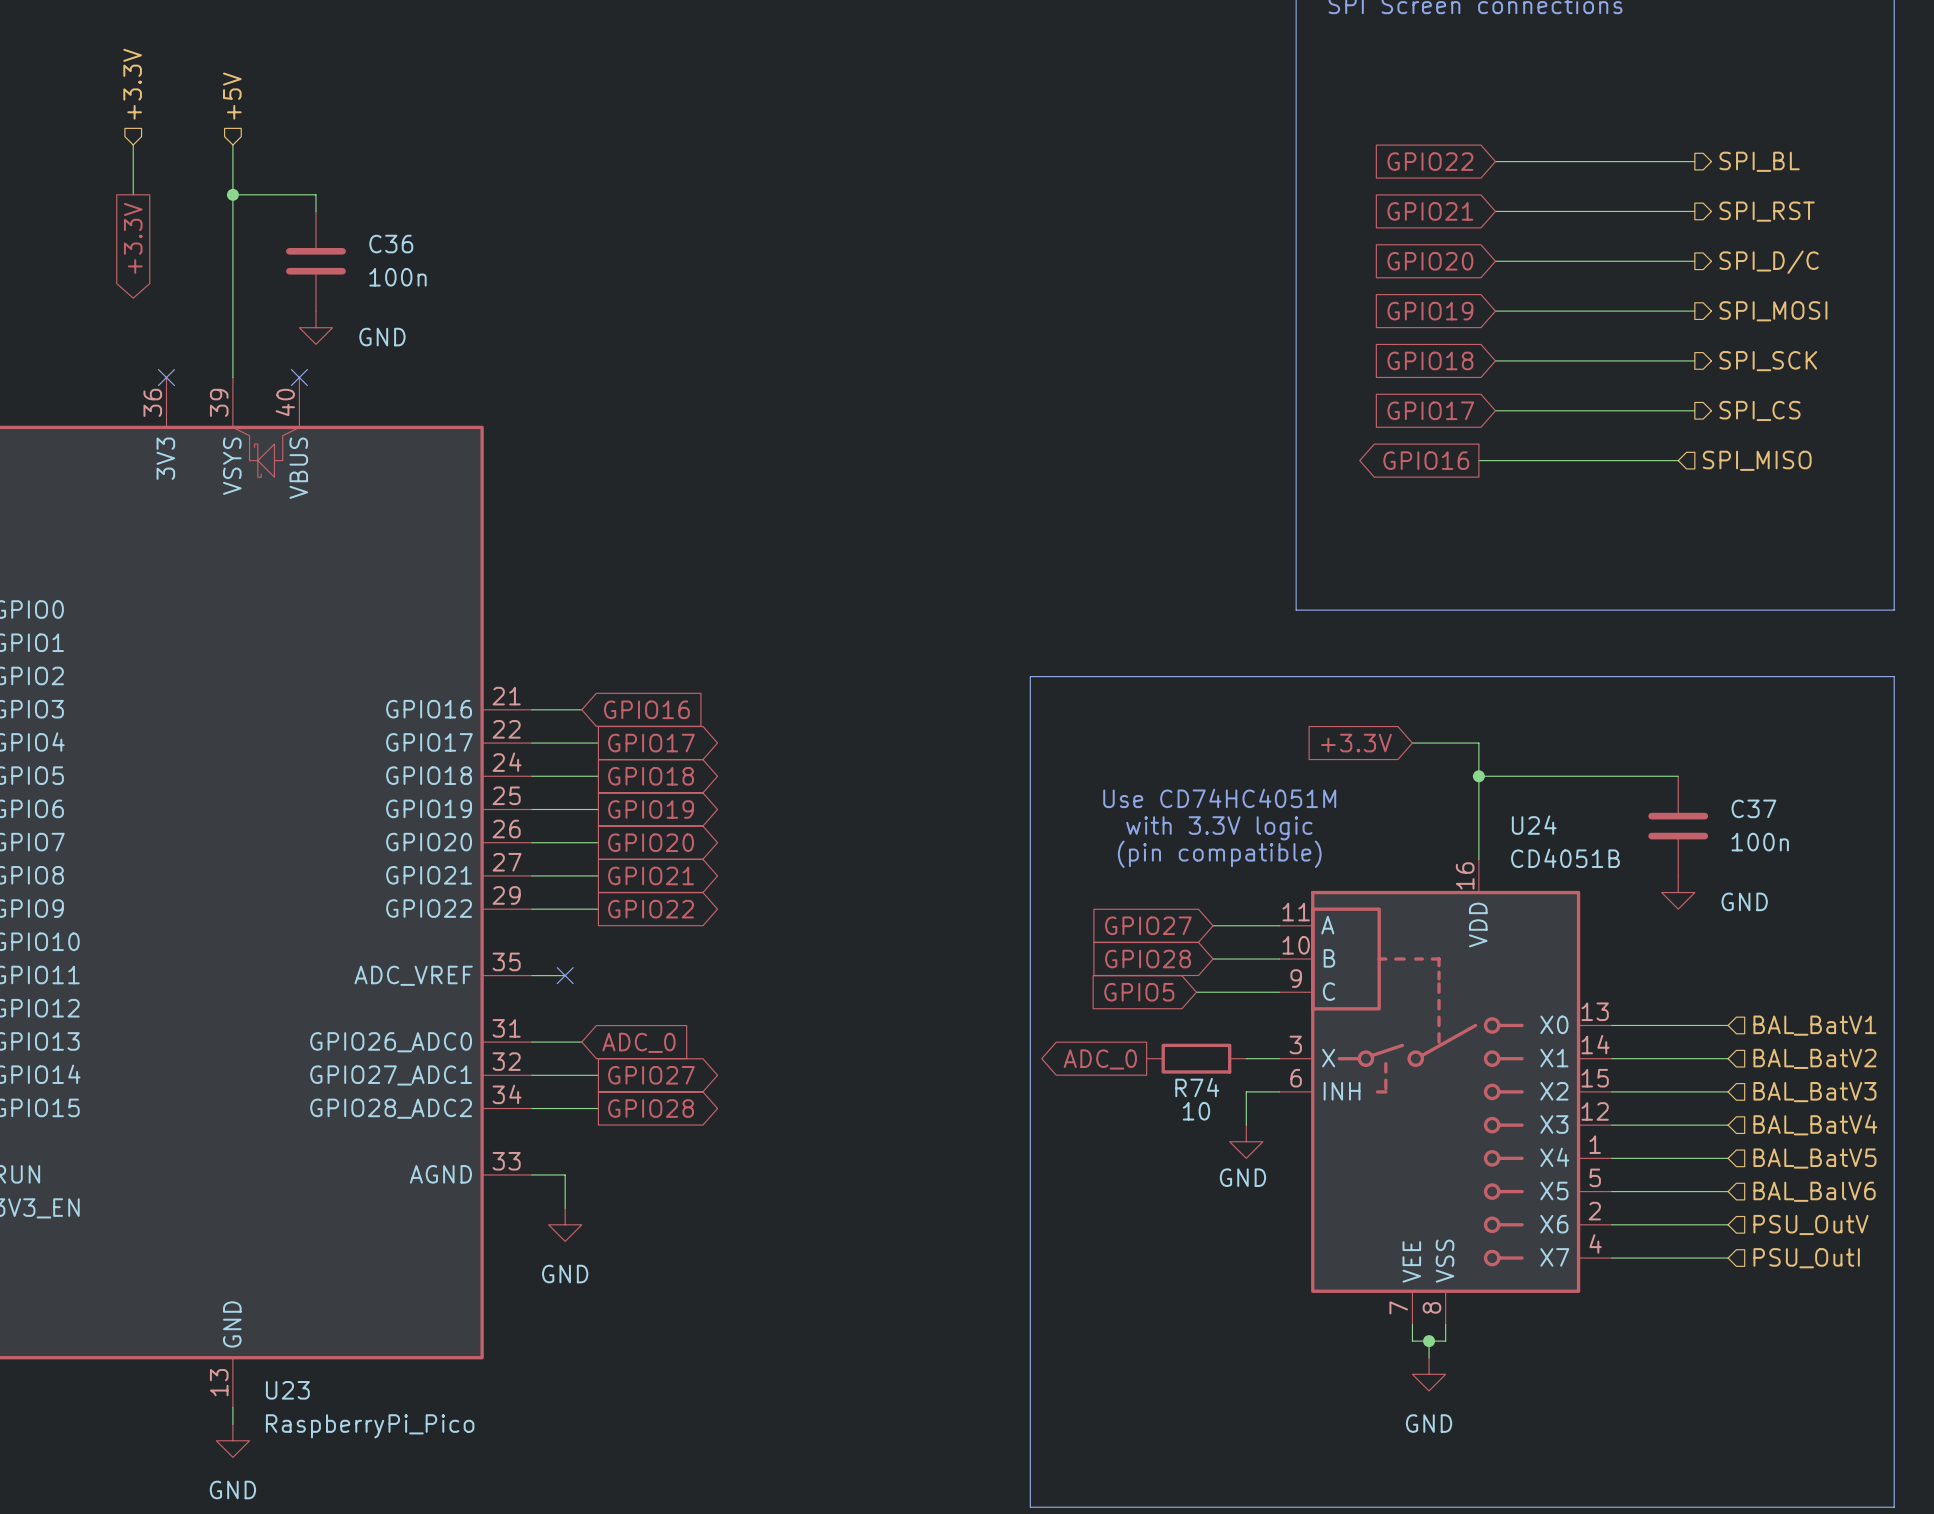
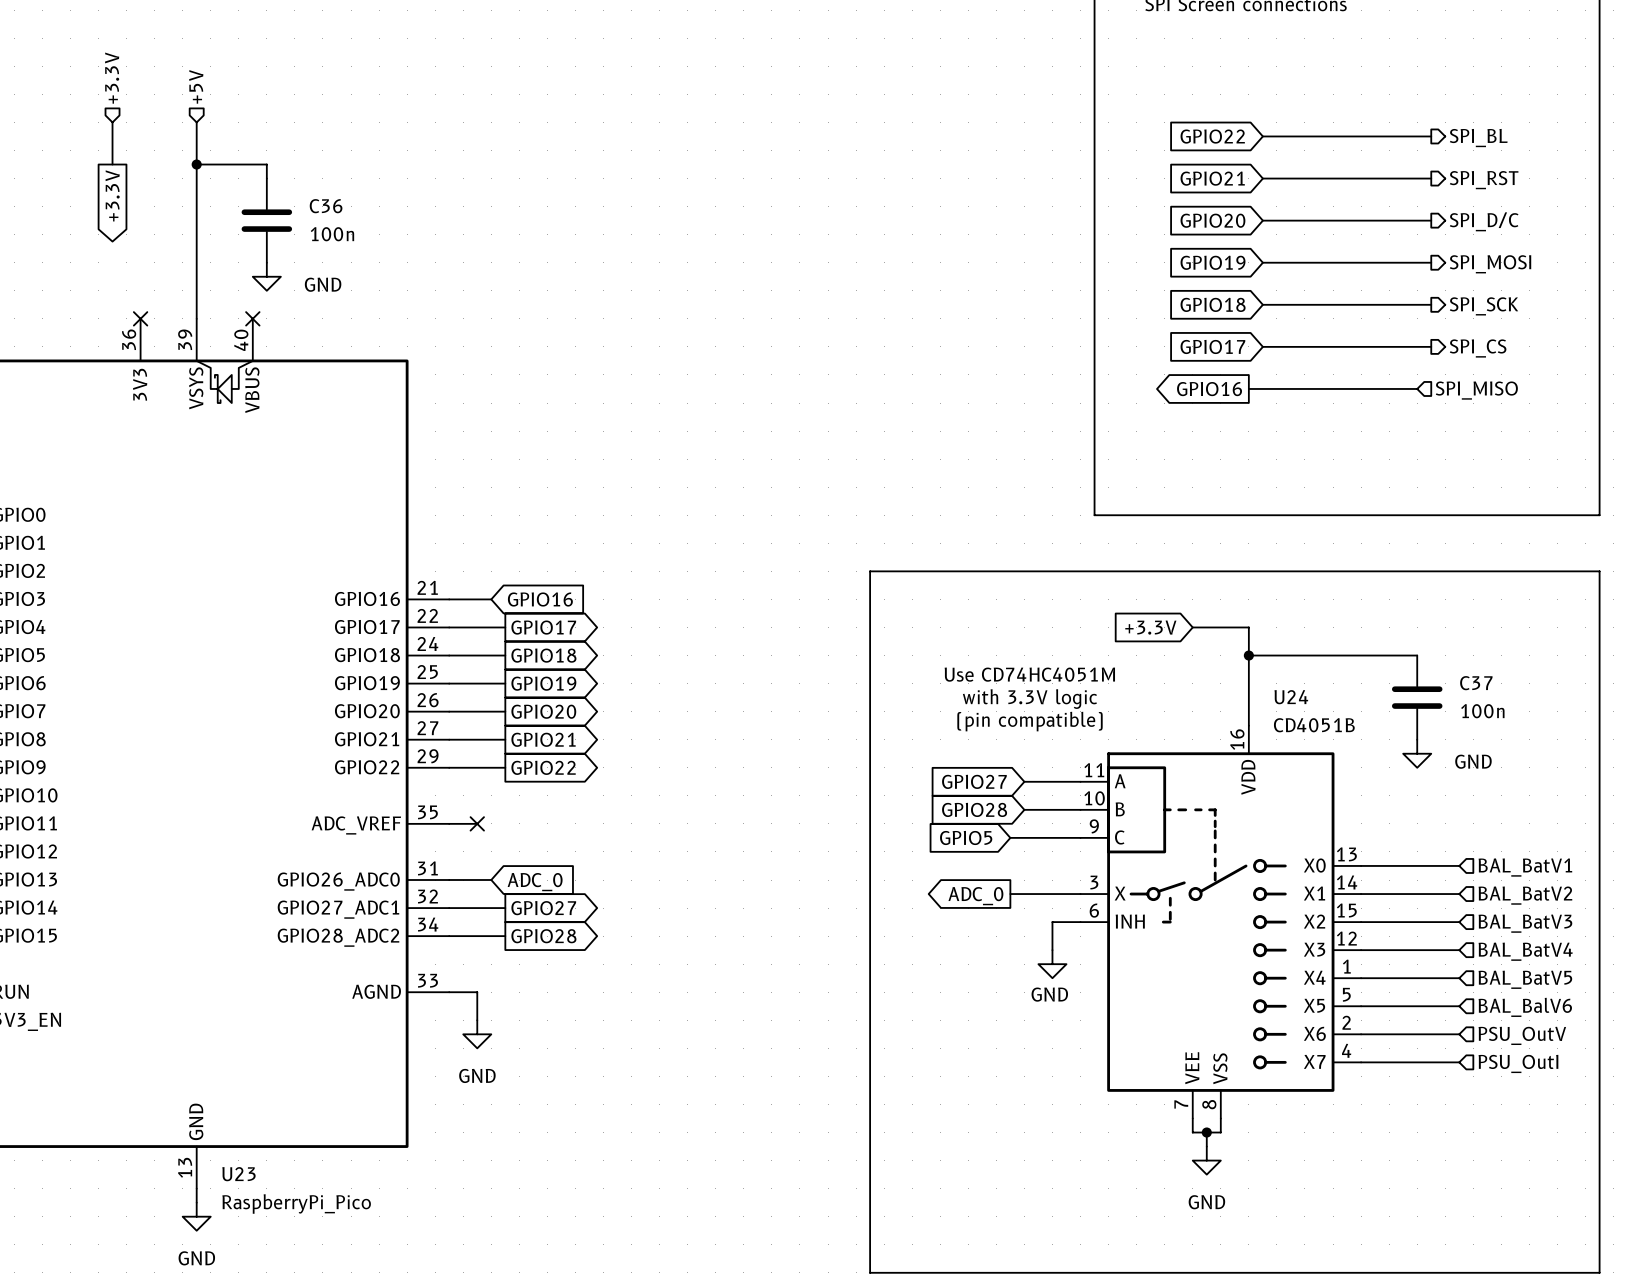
wire: none -> (1010, 894) (1052, 894)
R74: 10 (1196, 1058) -> none
global label position: ADC_0 (1100, 1059) -> ADC_0 (975, 896)

